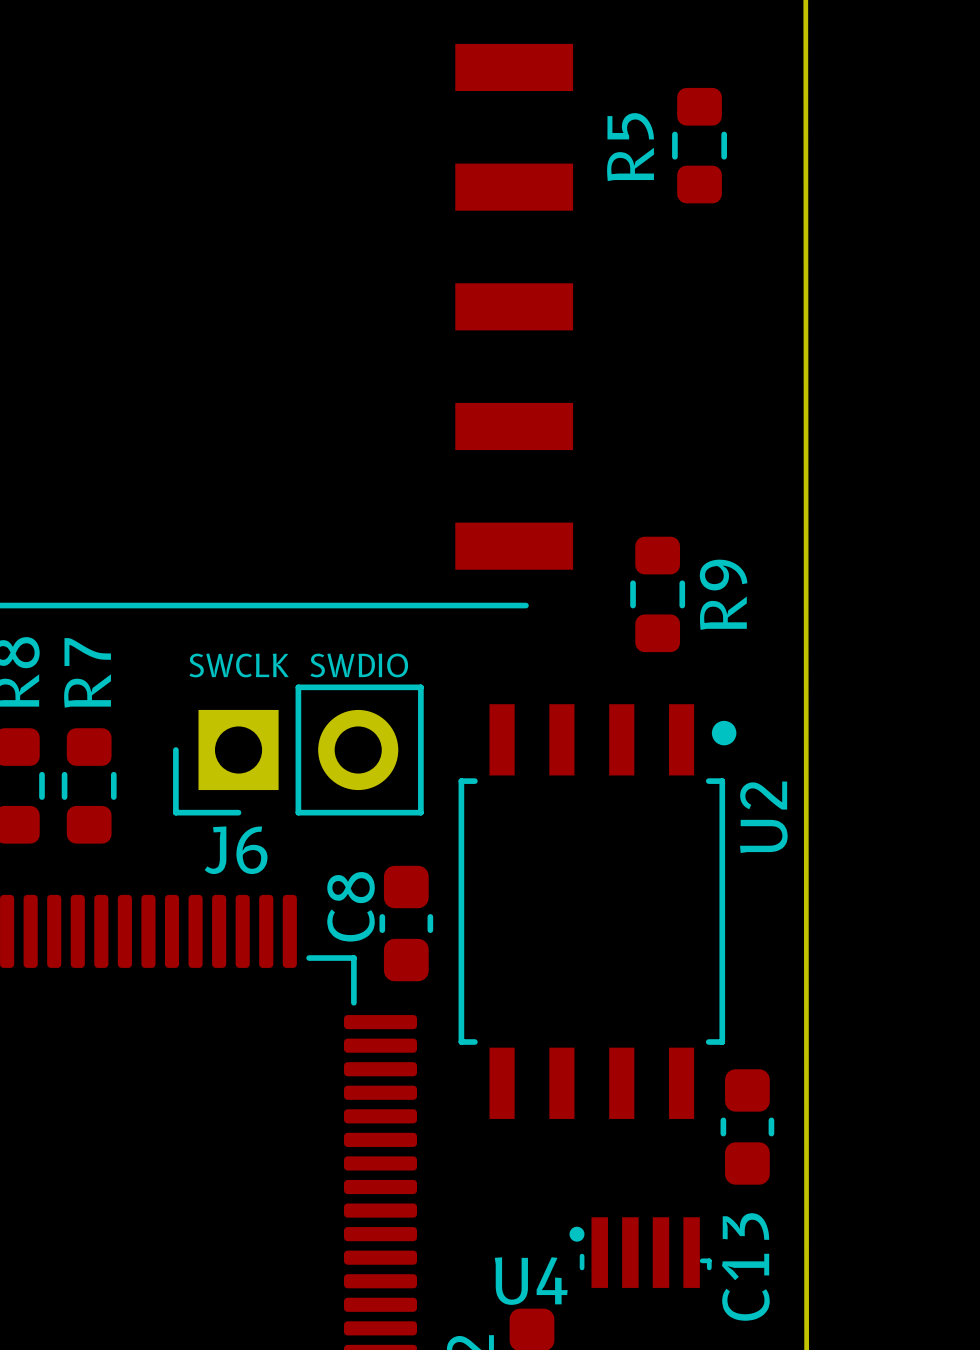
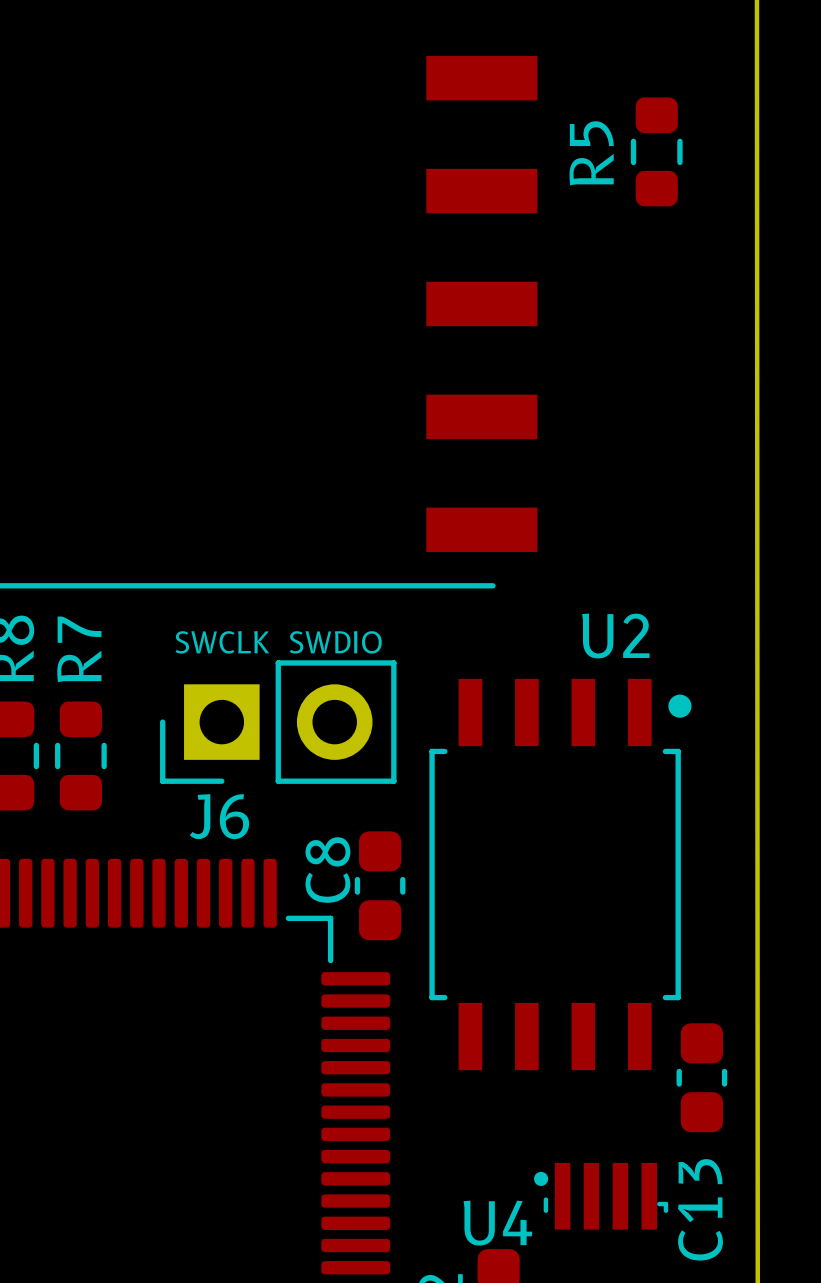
R9: (657, 594) -> none
U2 name rotation: 0° (763, 817) -> 90° clockwise (615, 635)
U2 name position: U2 (763, 817) -> U2 (615, 635)

